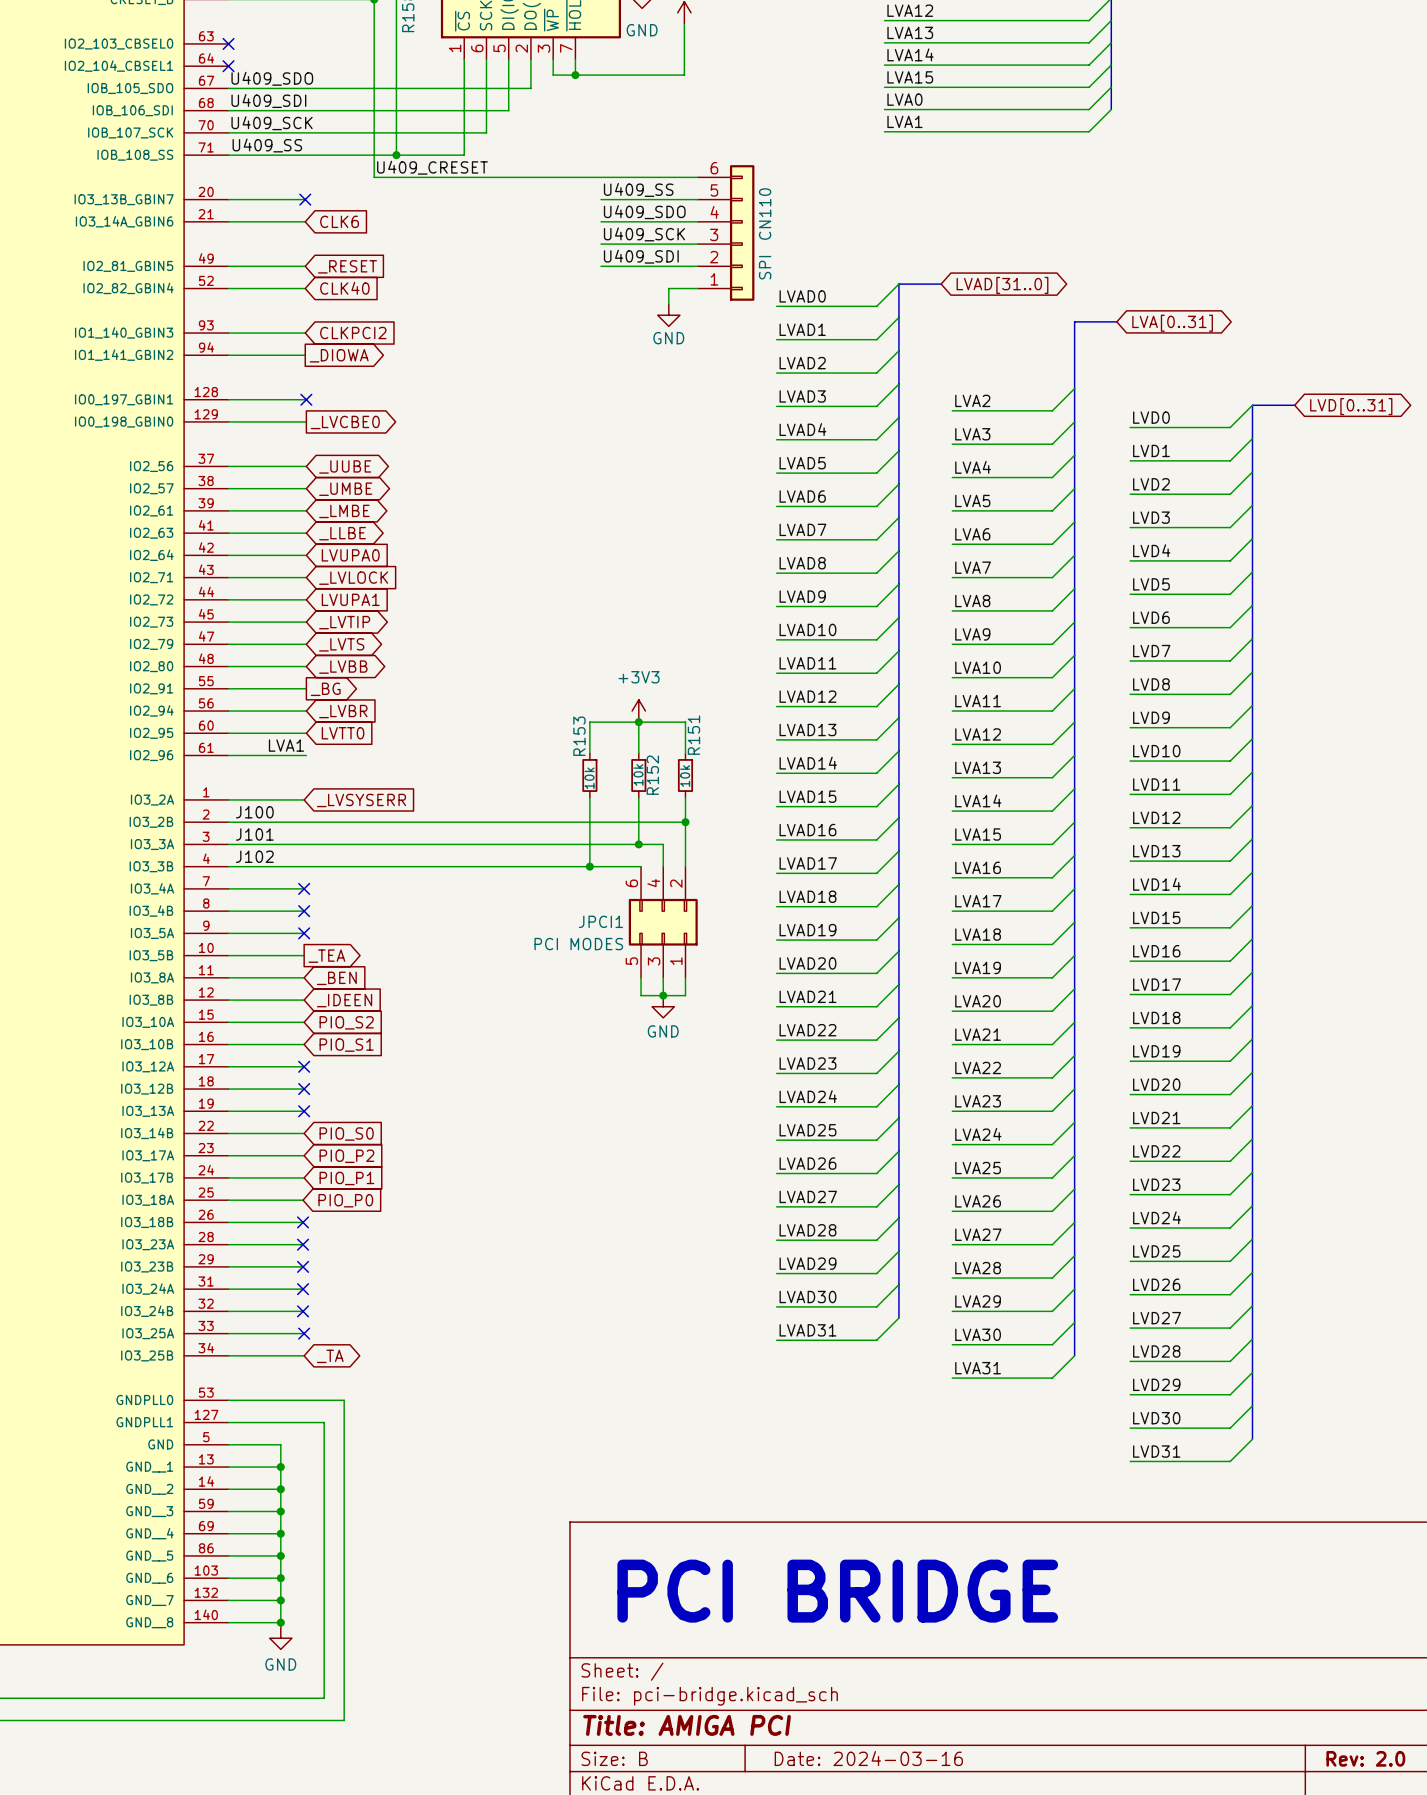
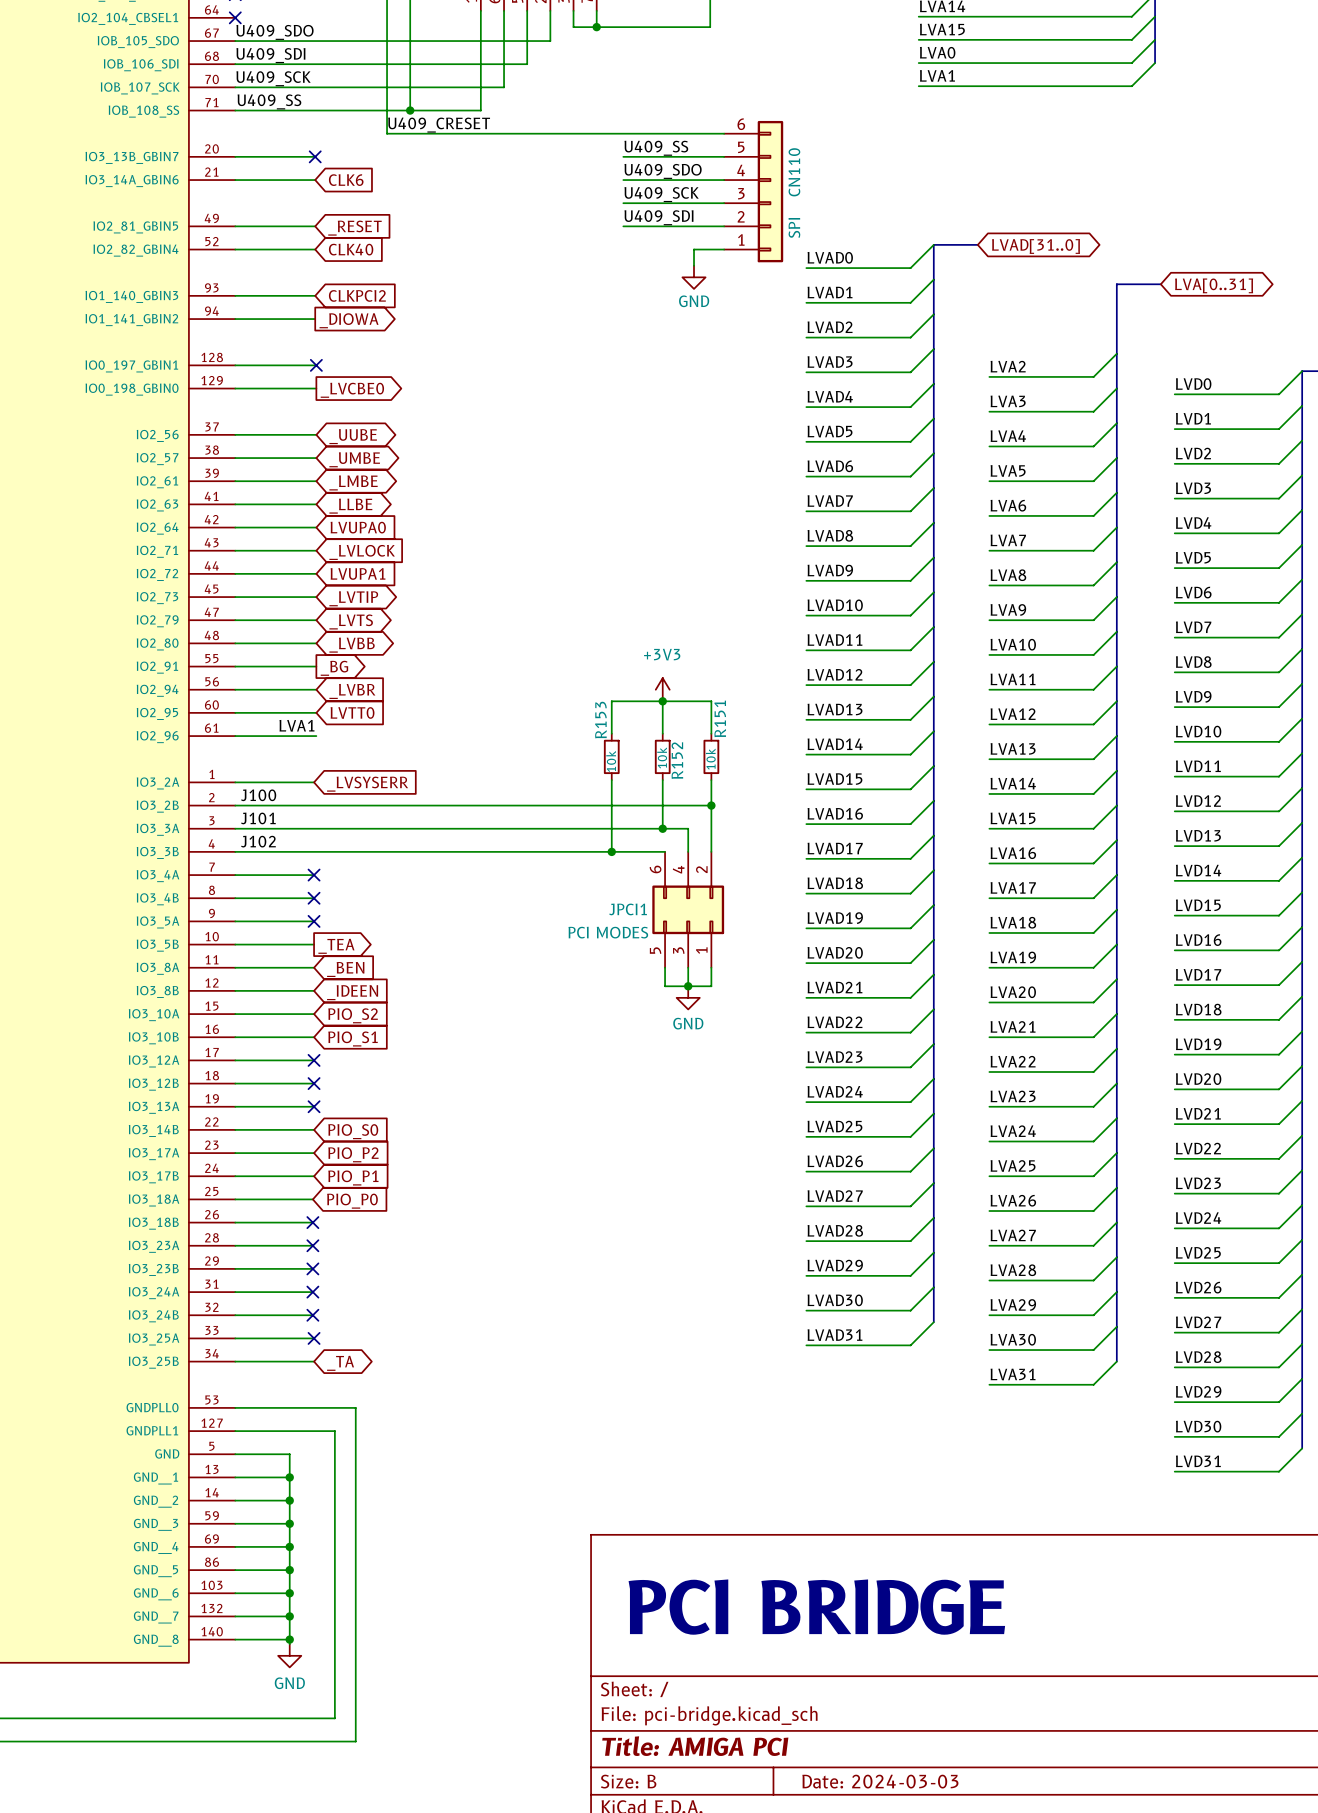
title block: Date: 2024-03-16 (868, 1758) -> Date: 2024-03-03 (880, 1781)

